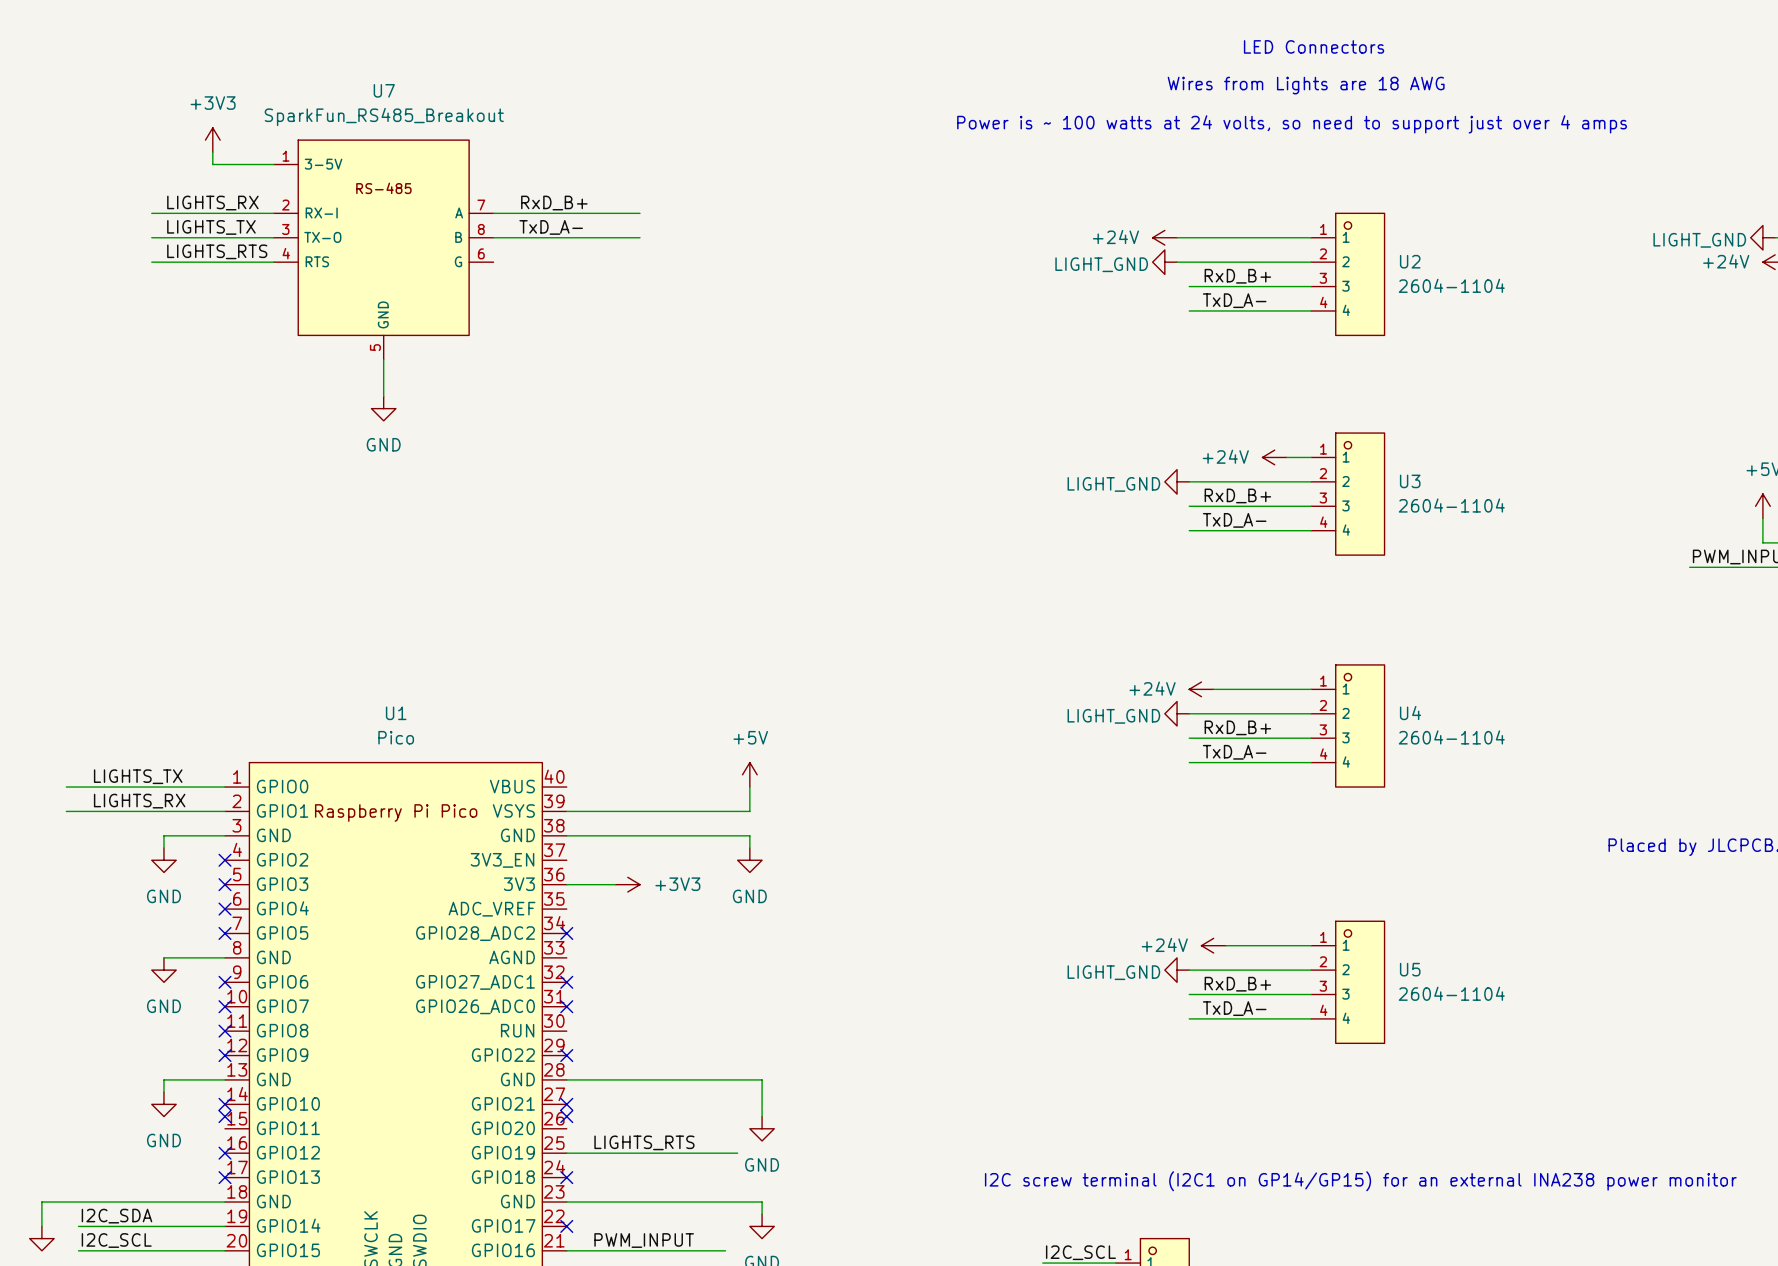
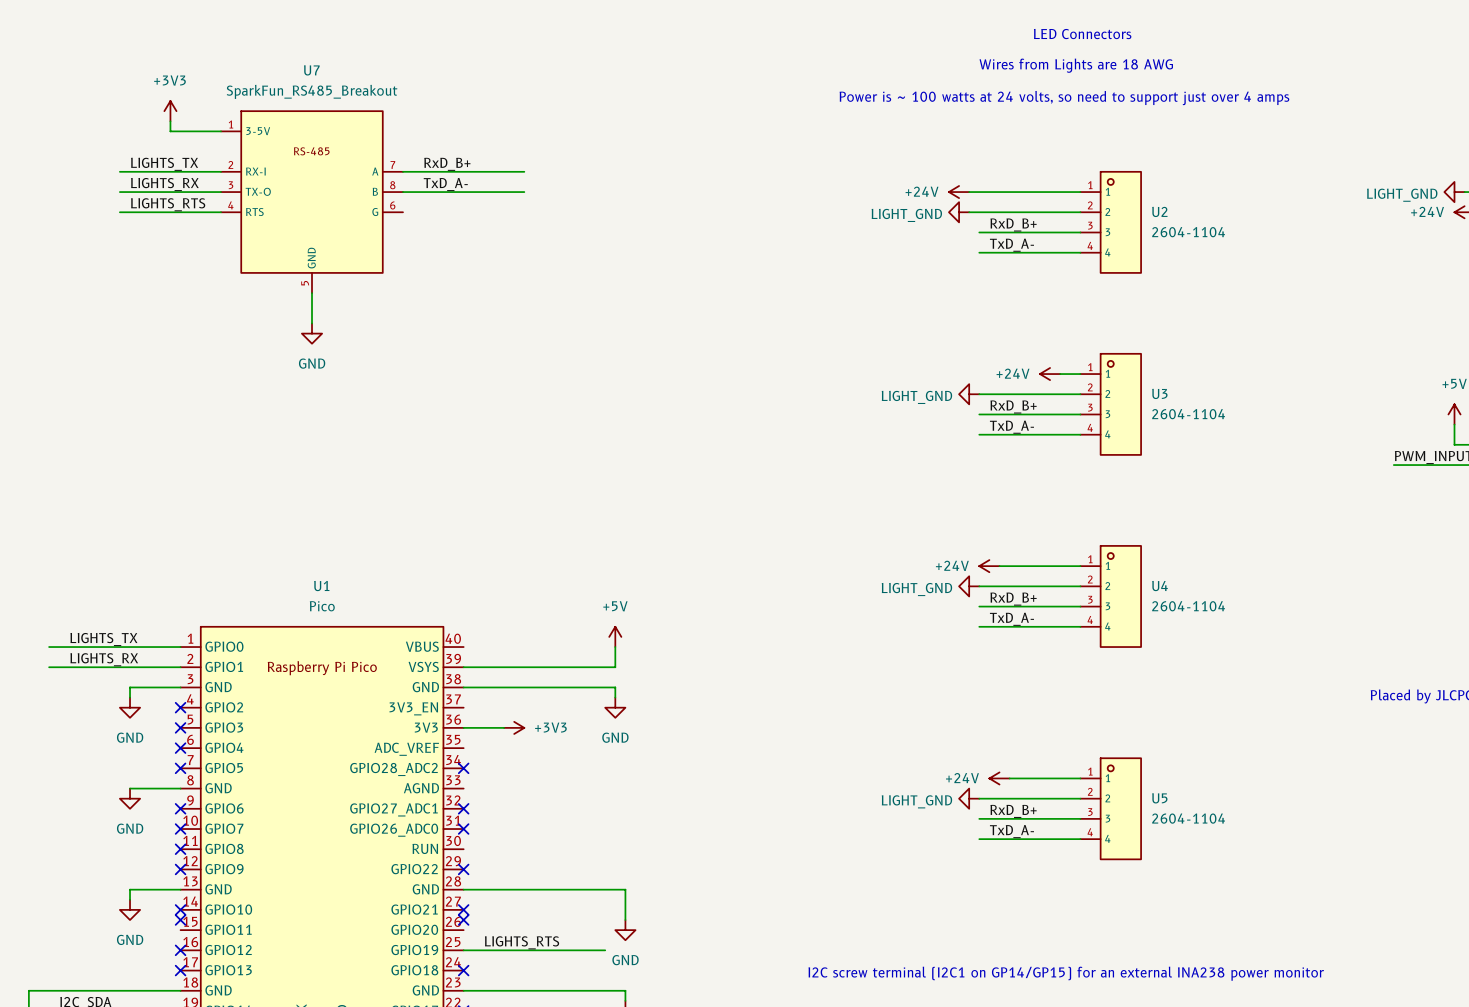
label: LIGHTS_RX (212, 203) -> LIGHTS_TX (164, 164)
label: LIGHTS_TX (211, 227) -> LIGHTS_RX (164, 184)

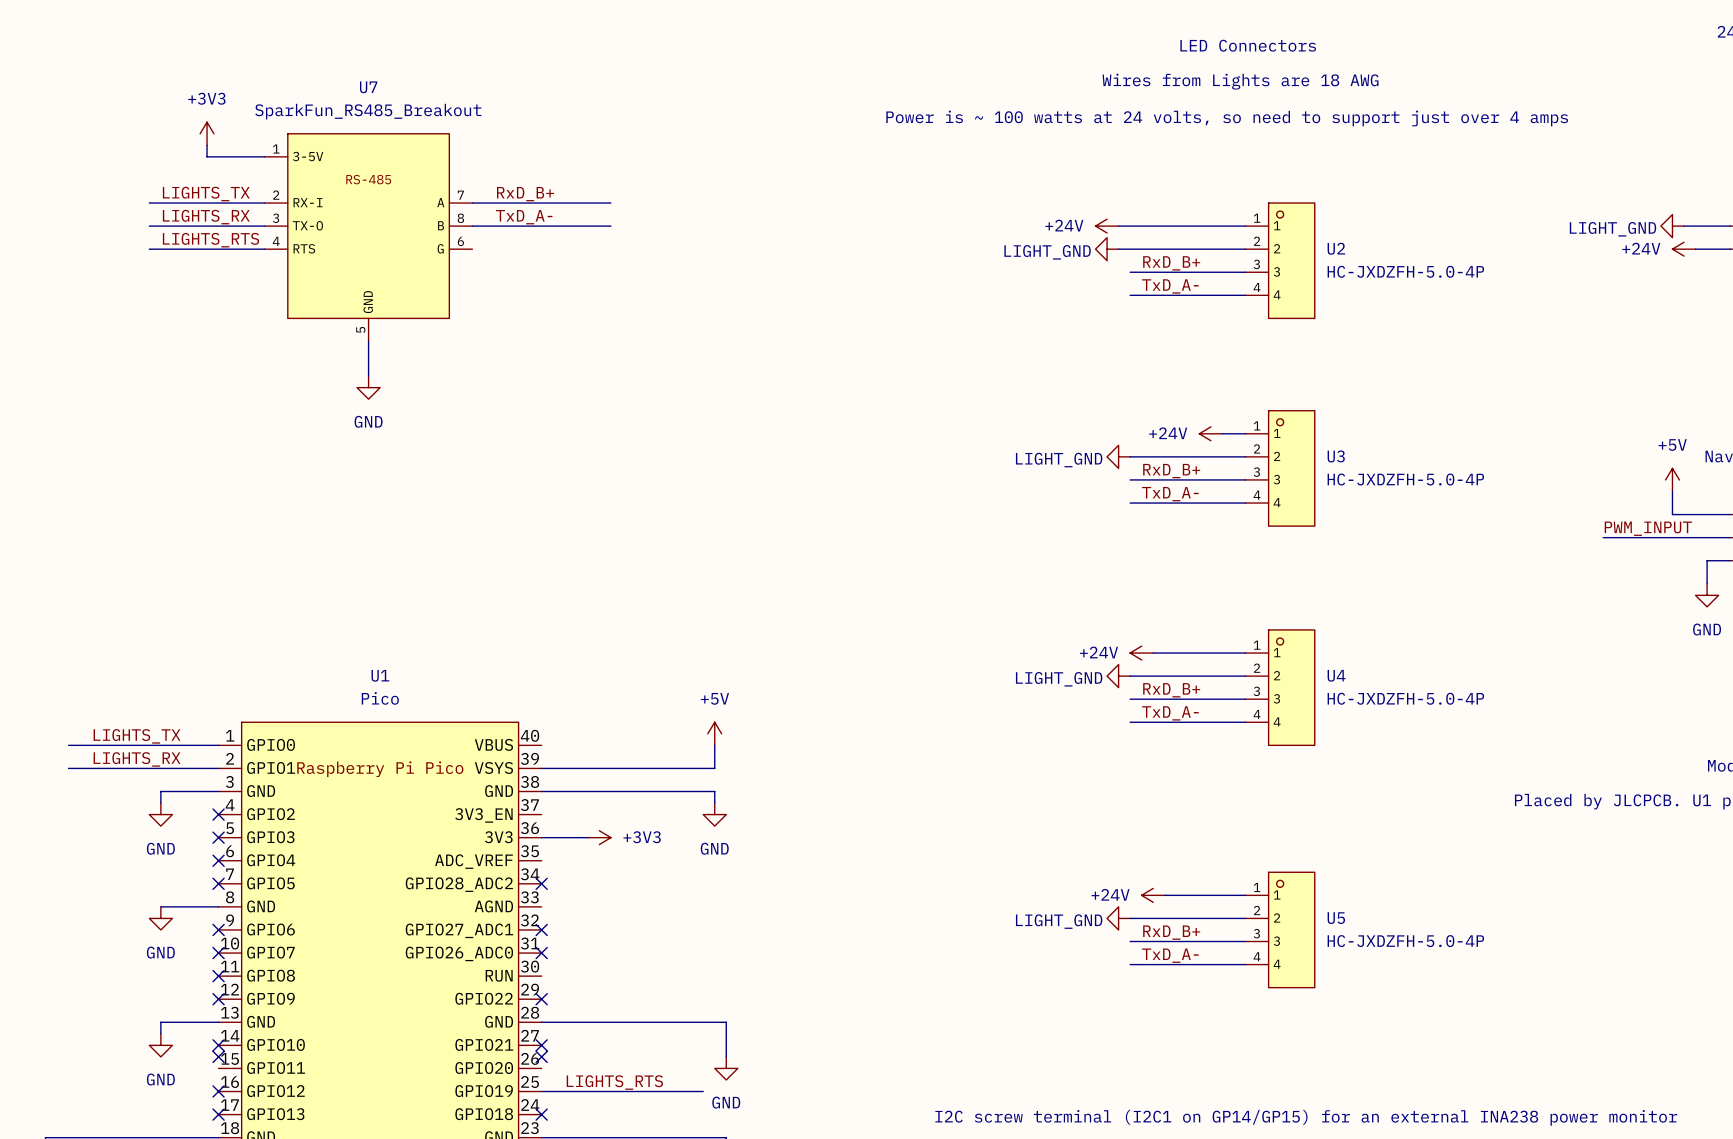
U2 value: 2604-1104 (1188, 232) -> HC-JXDZFH-5.0-4P (1405, 271)
U3 value: 2604-1104 (1188, 414) -> HC-JXDZFH-5.0-4P (1405, 479)
U4 value: 2604-1104 (1188, 606) -> HC-JXDZFH-5.0-4P (1405, 698)
U5 value: 2604-1104 (1188, 818) -> HC-JXDZFH-5.0-4P (1405, 941)

